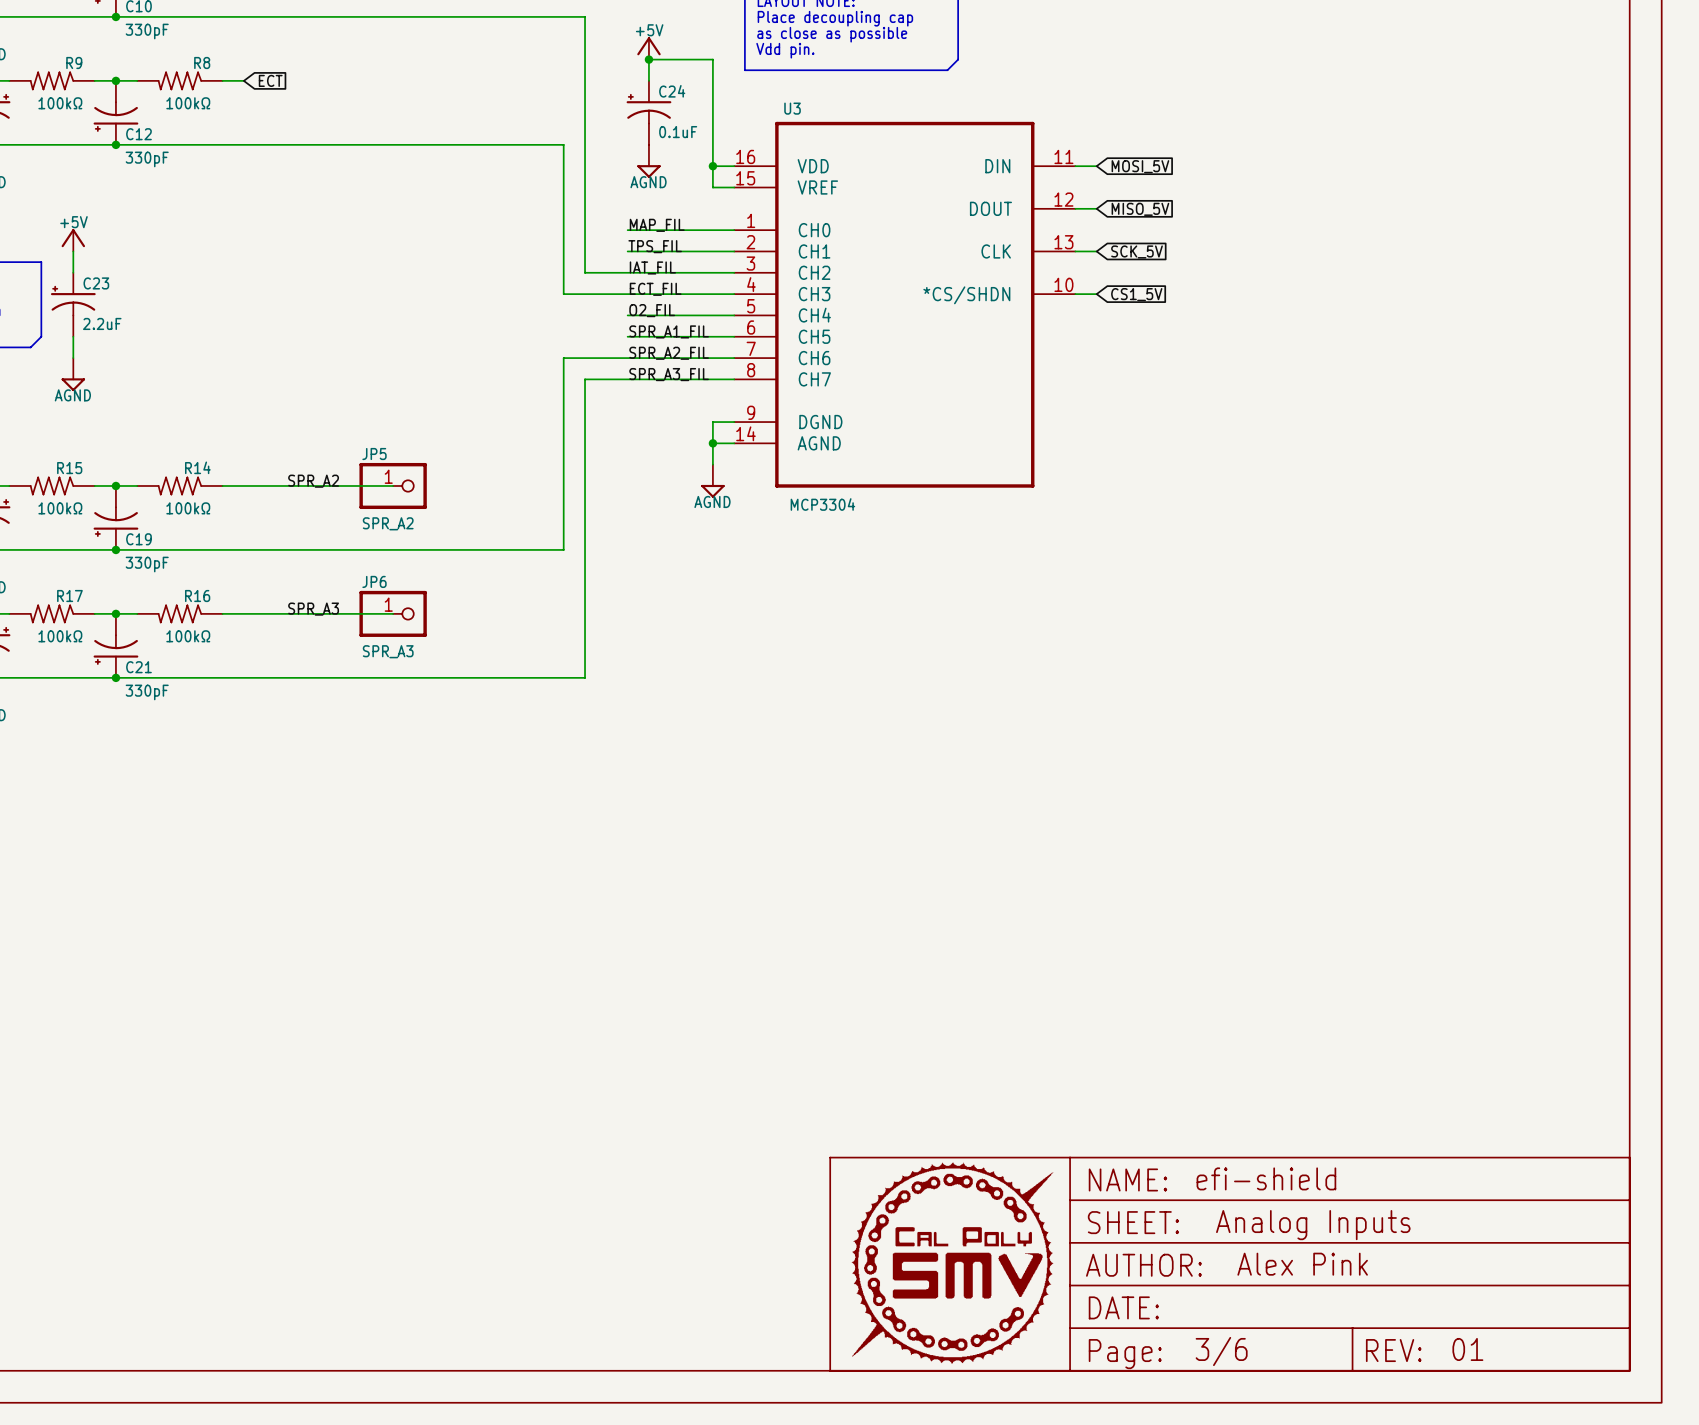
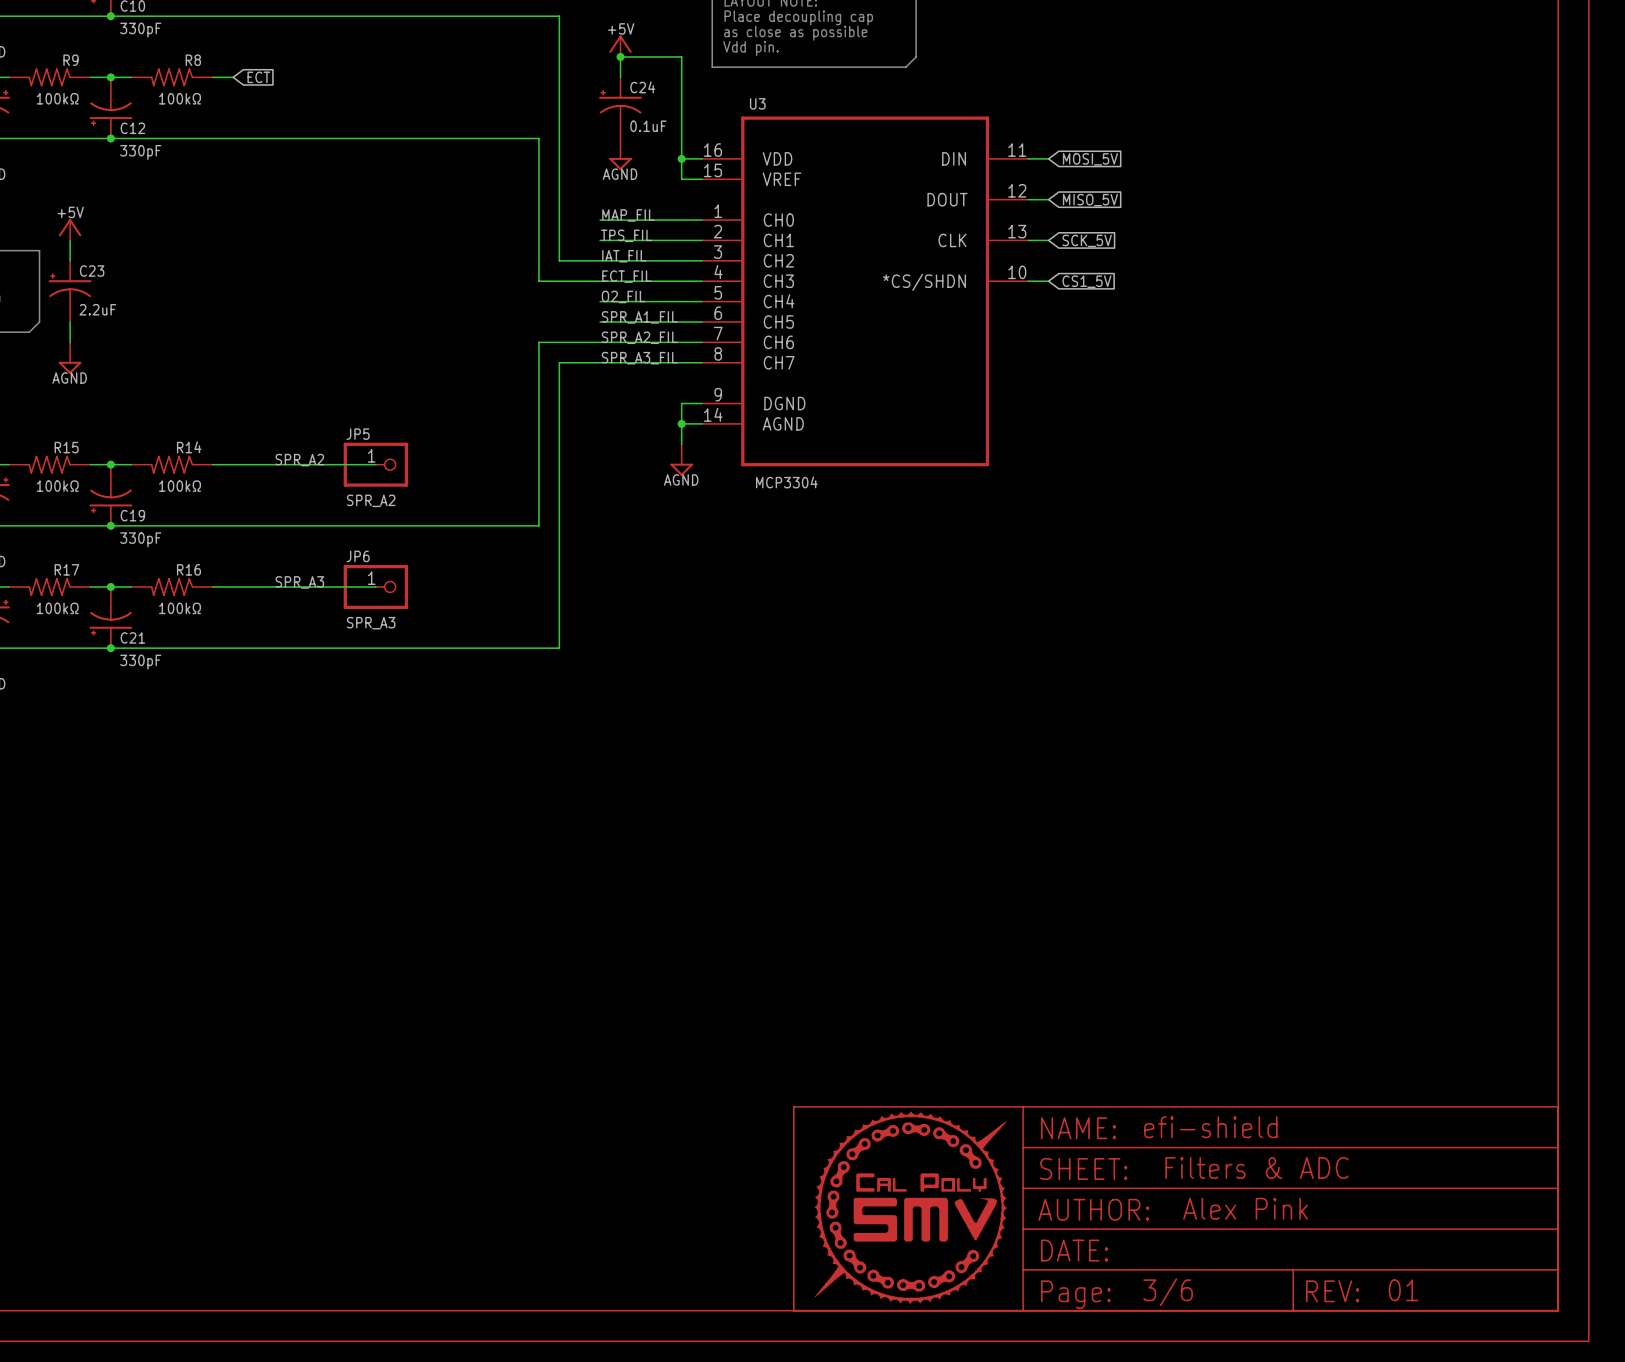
text: Analog Inputs (1313, 1225) -> Filters & ADC (1257, 1167)

